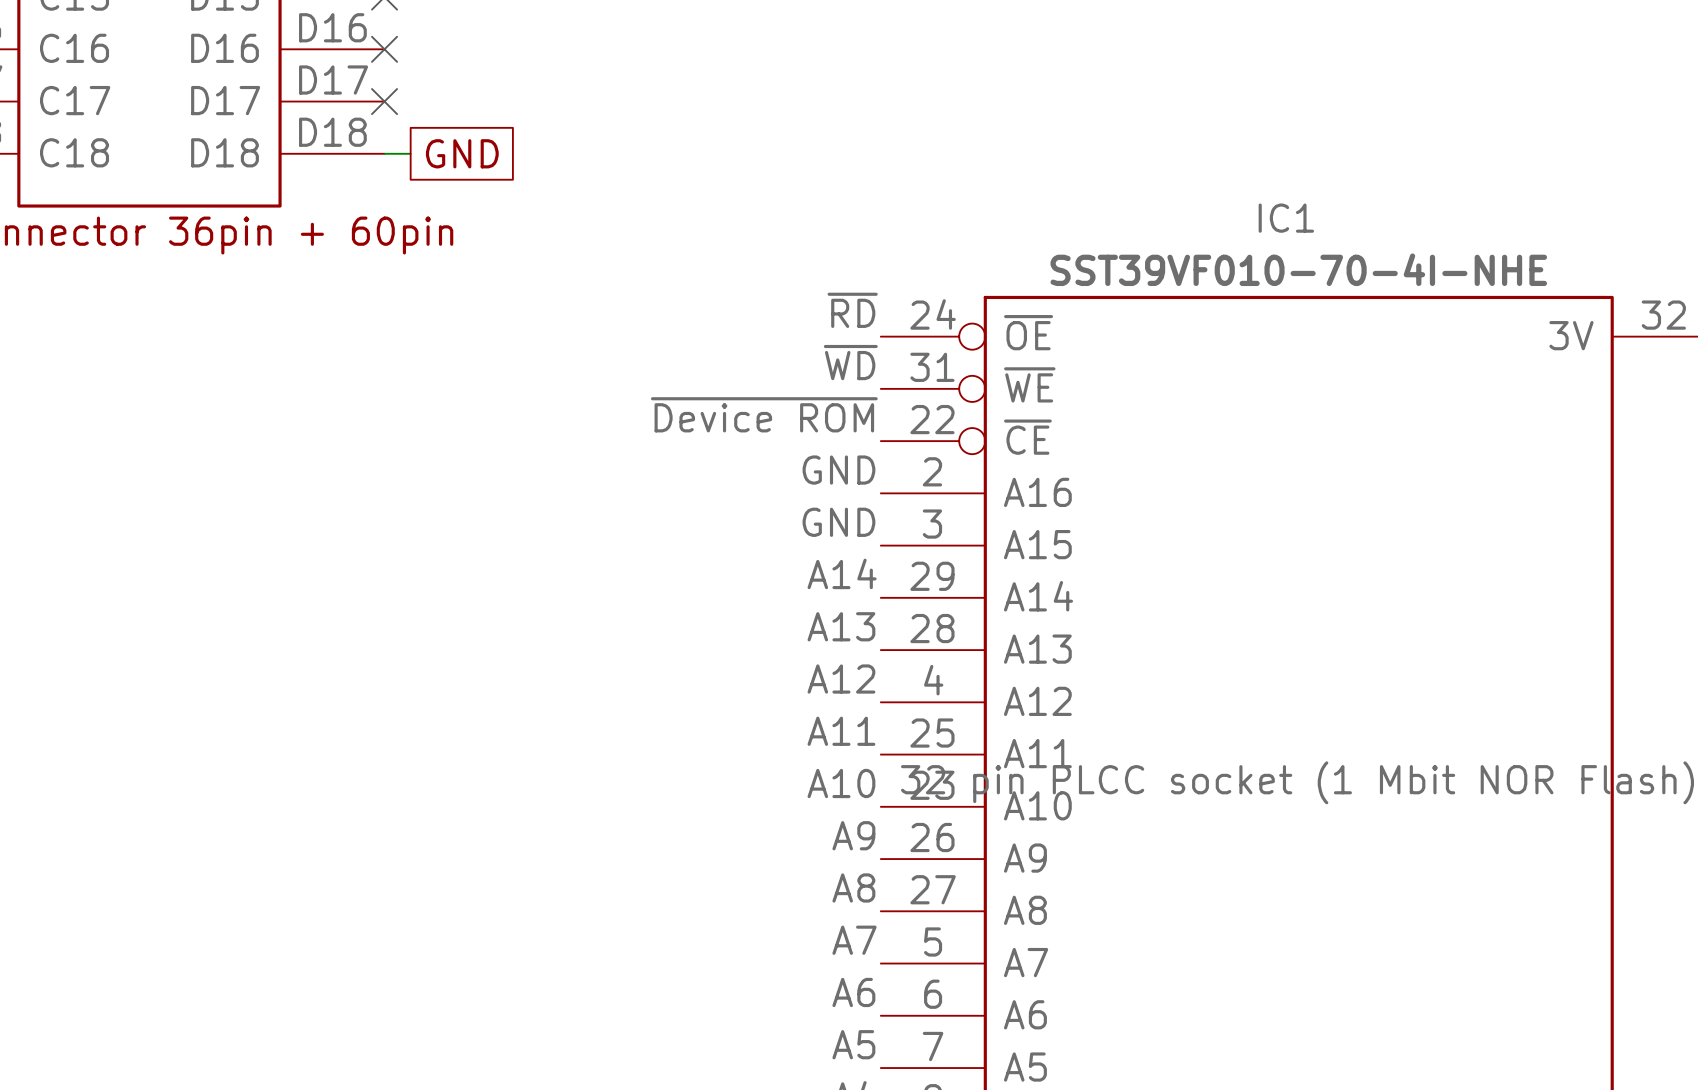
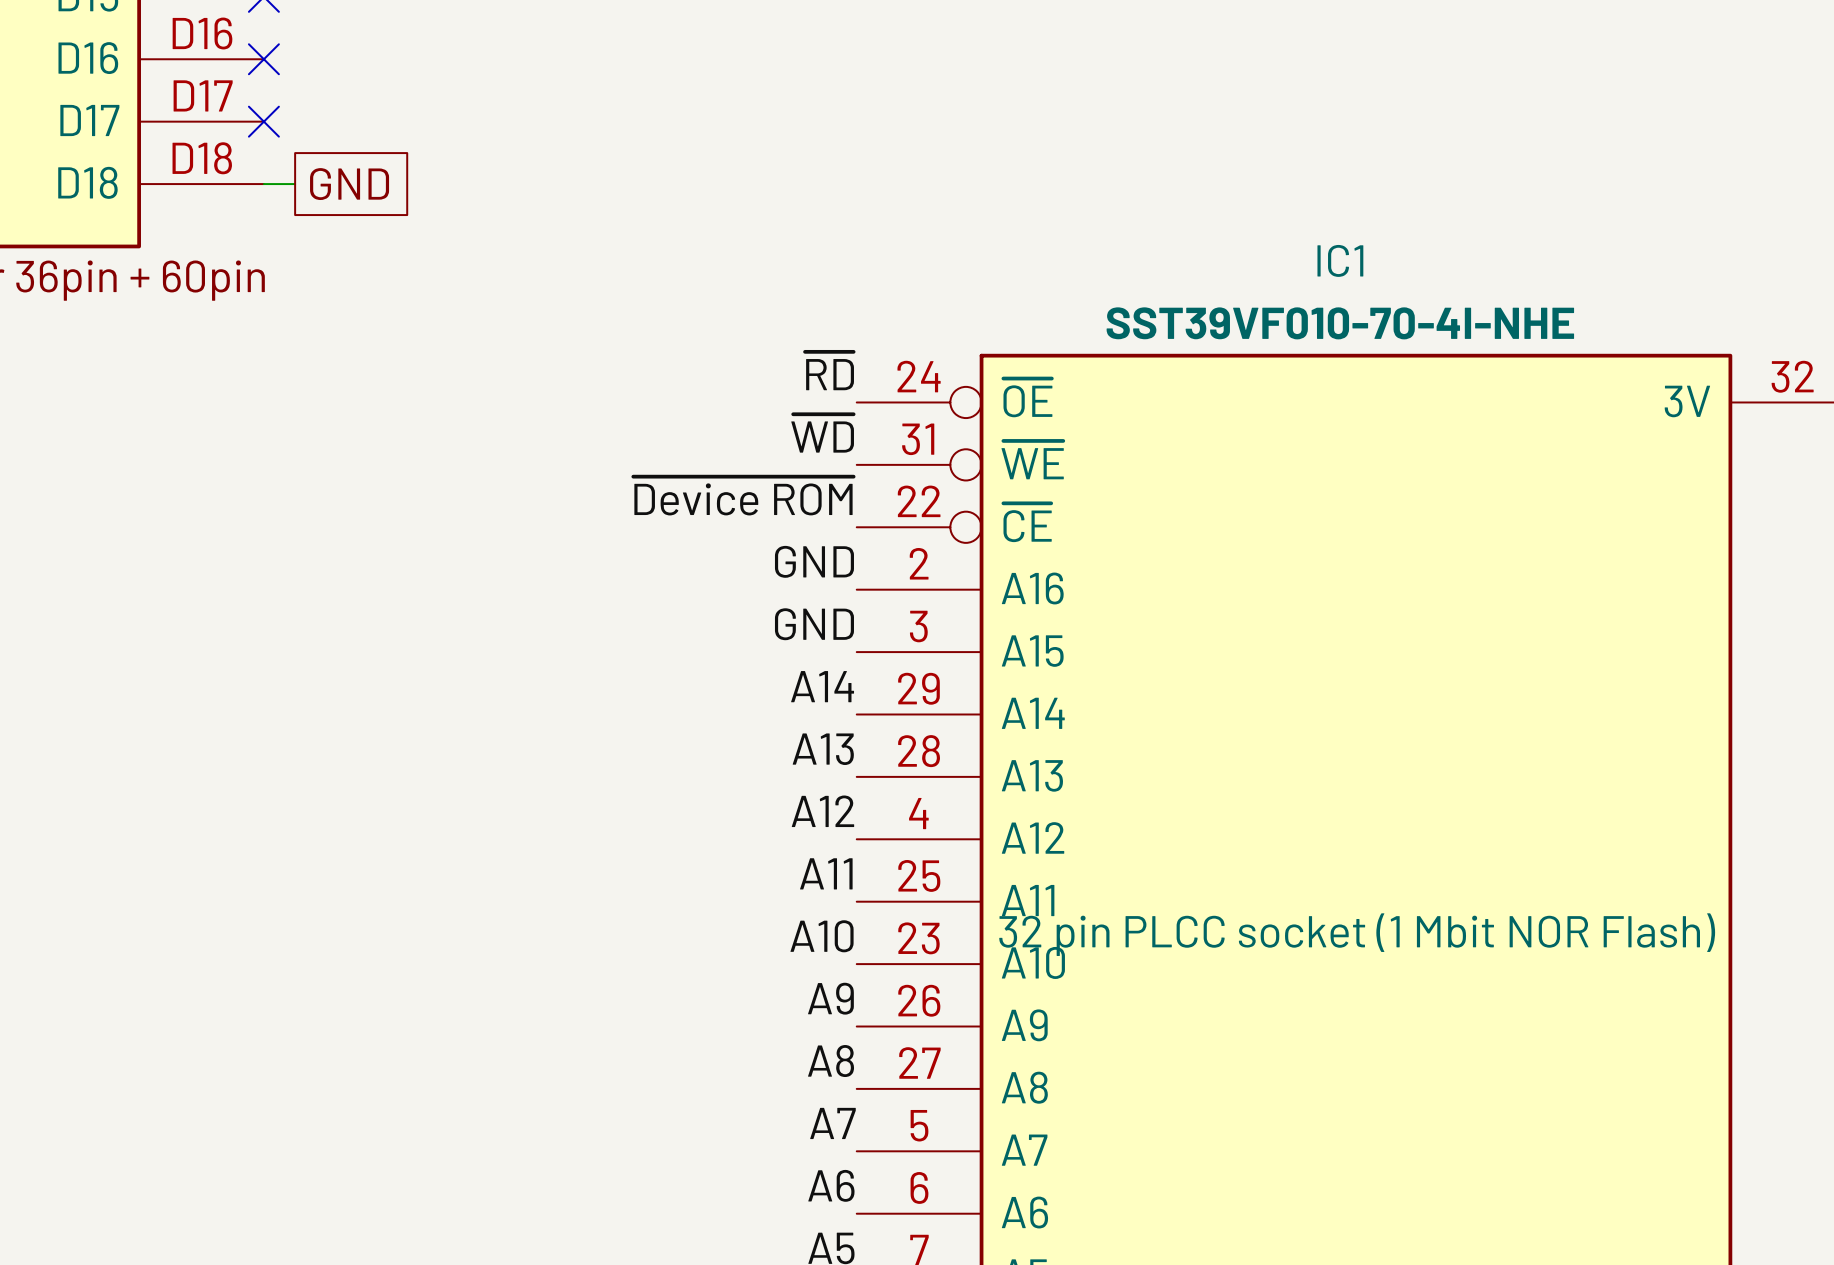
IC1 value position: SST39VF010-70-4I-NHE (1298, 269) -> SST39VF010-70-4I-NHE (1340, 323)

